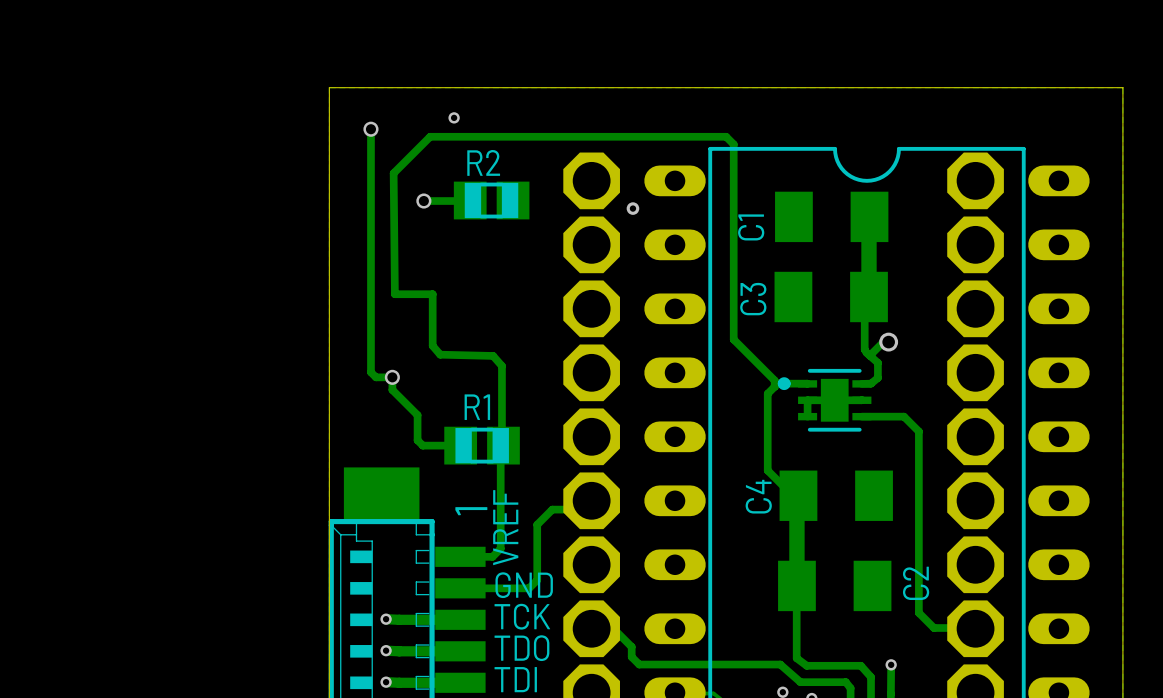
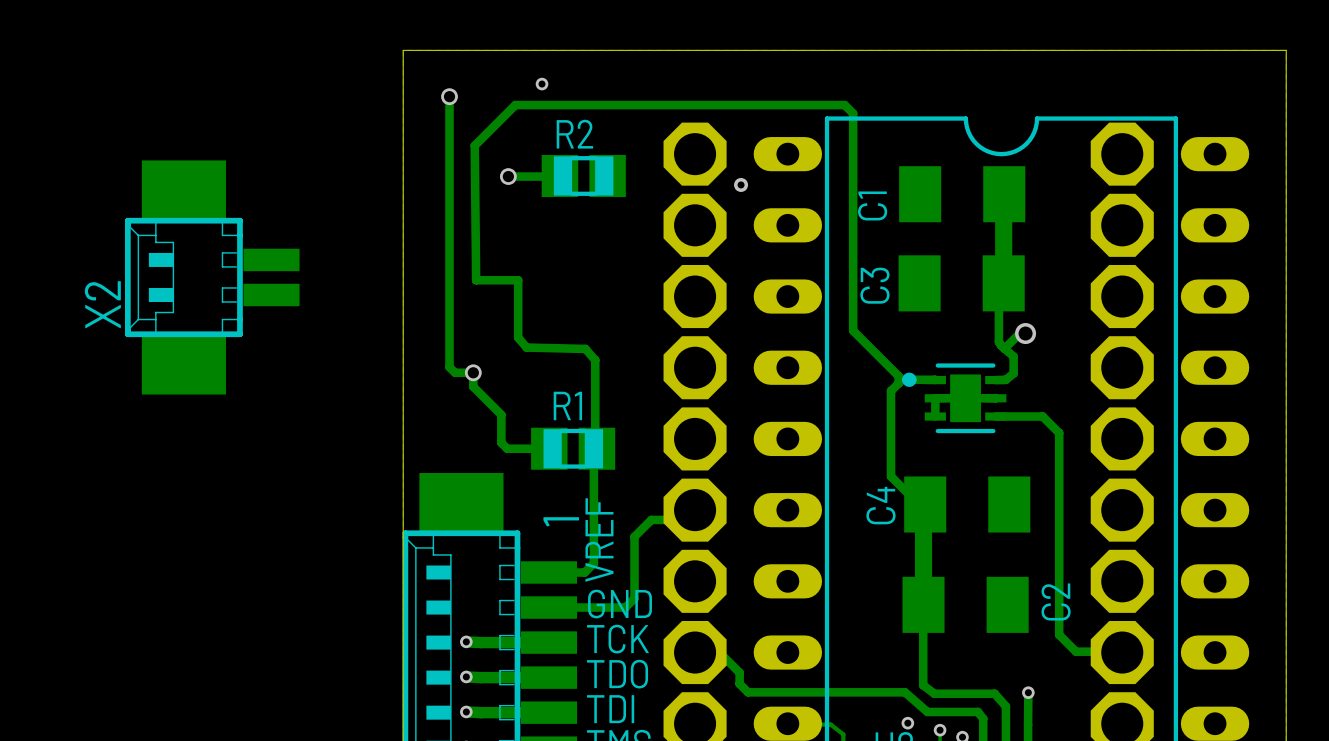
X2: none -> (212, 277)

